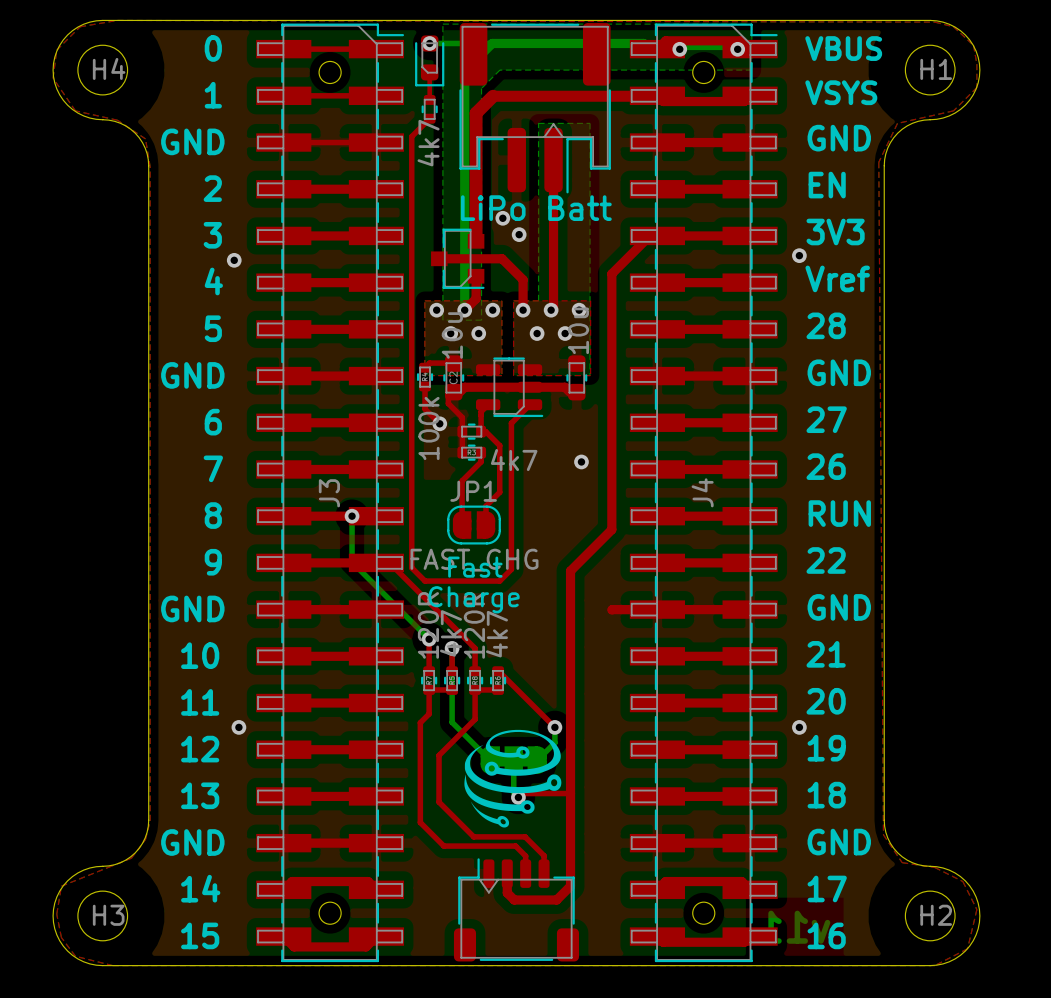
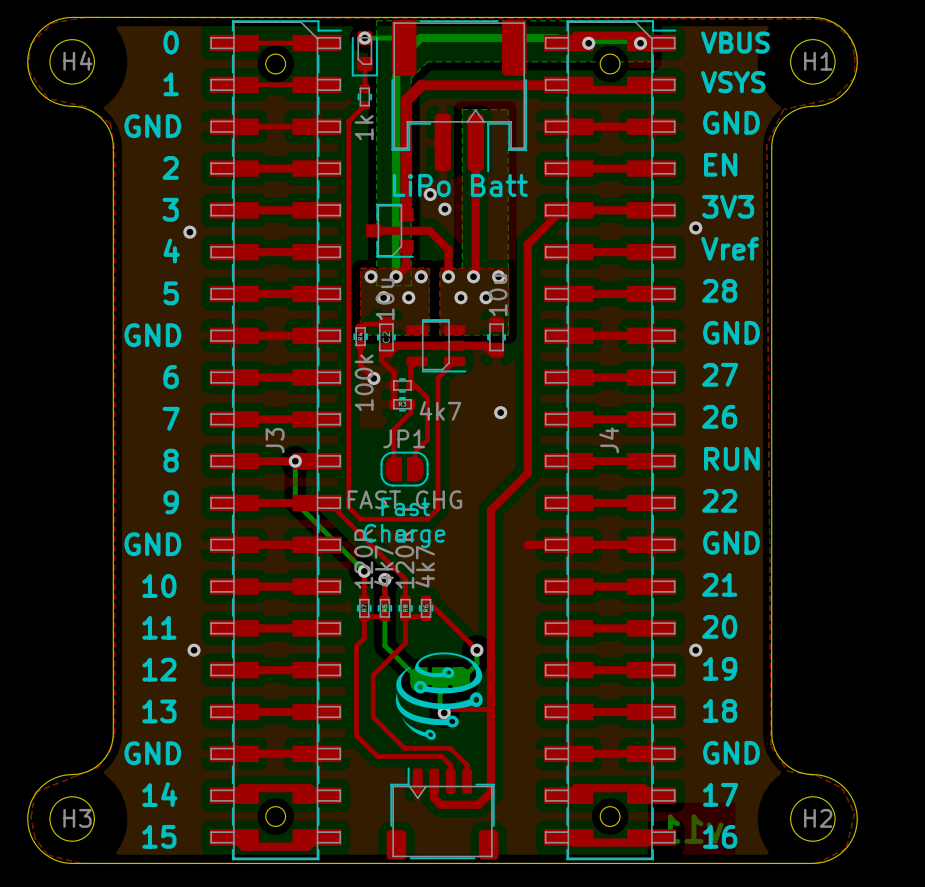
part value: 4k7 (428, 143) -> 1k (364, 127)

